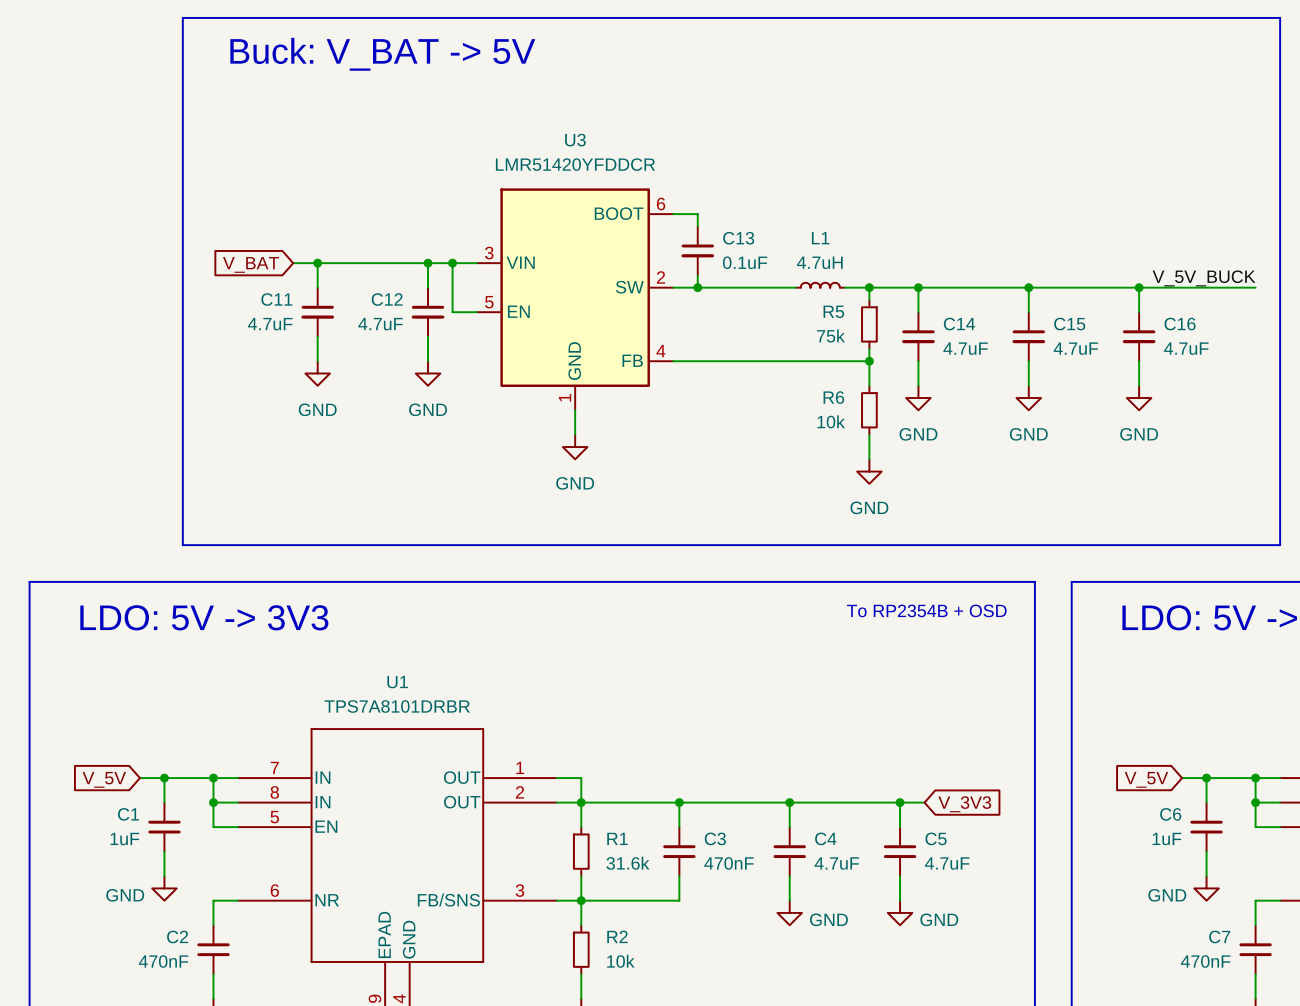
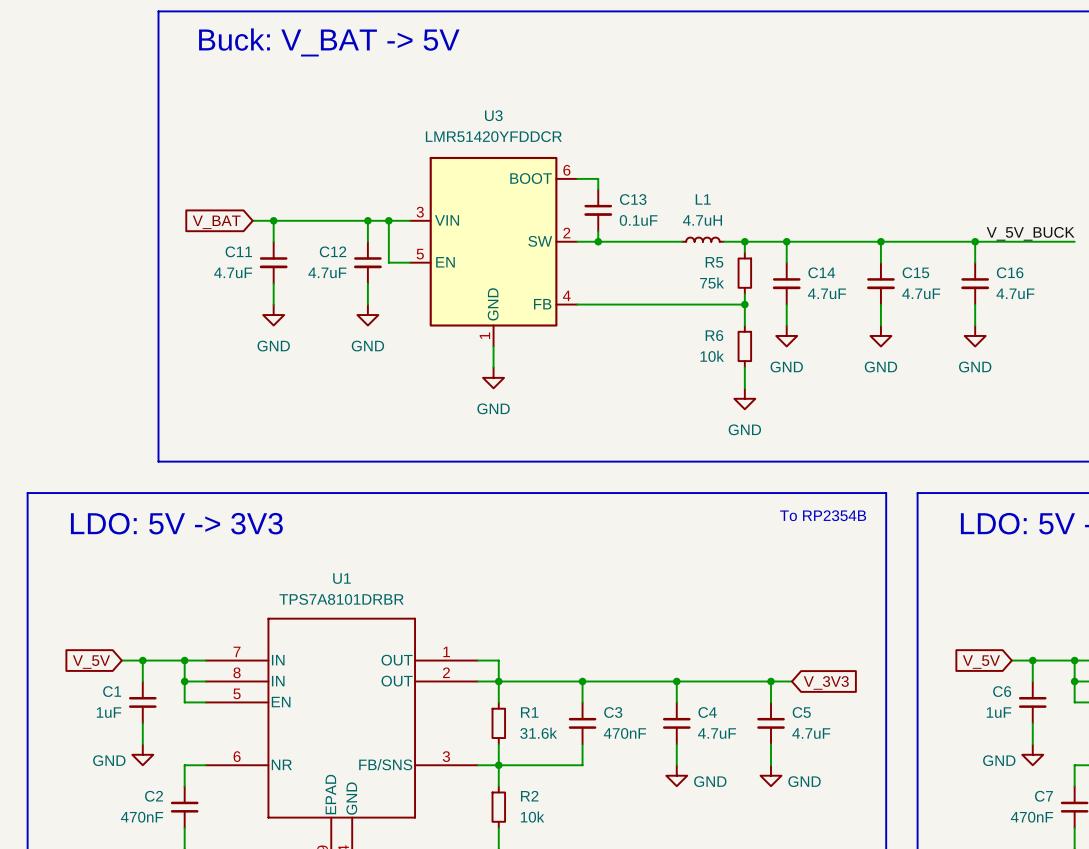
text: To RP2354B + OSD (926, 610) -> To RP2354B (823, 515)

